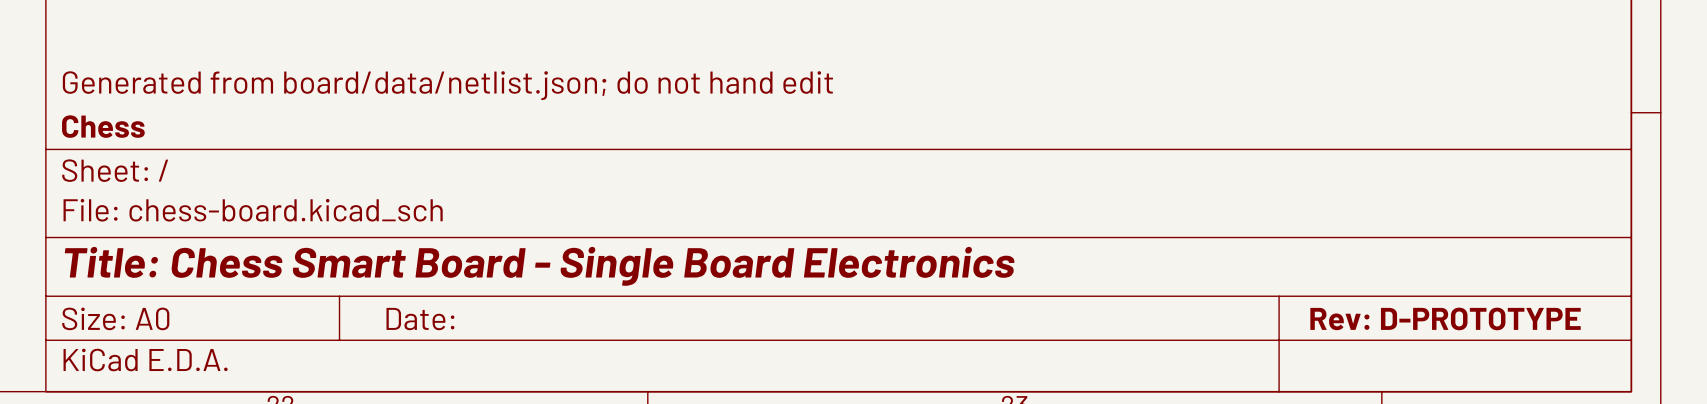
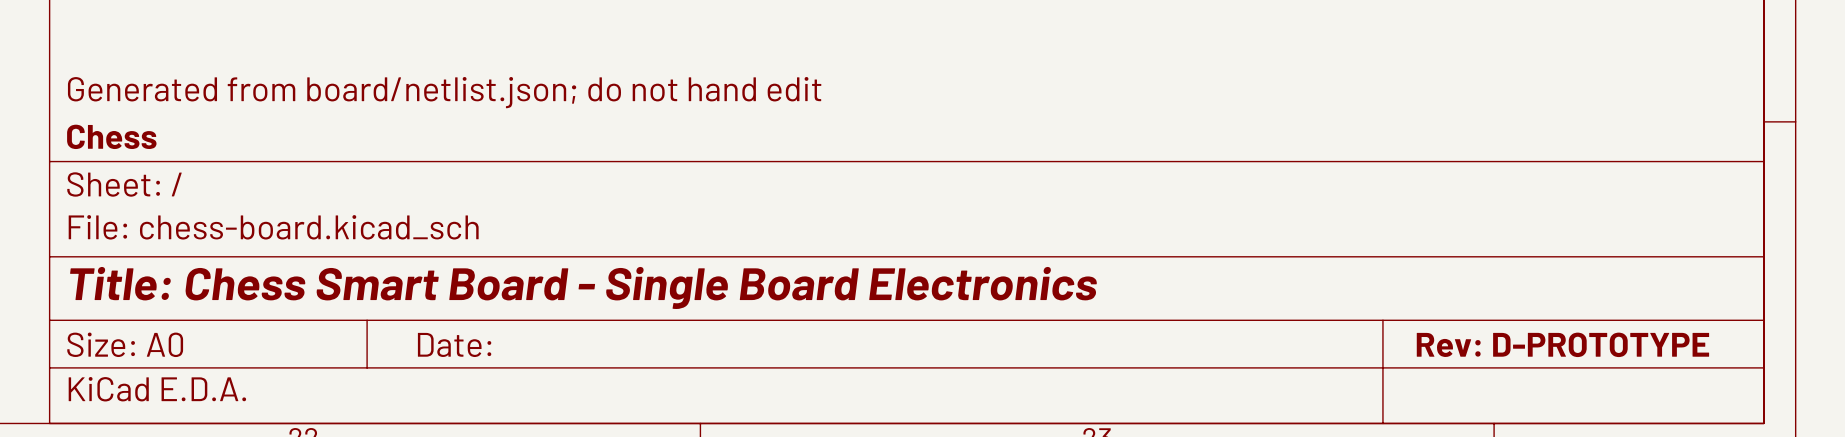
title block: Generated from board/data/netlist.json; do not hand edit (447, 85) -> Generated from board/netlist.json; do not hand edit (444, 92)

